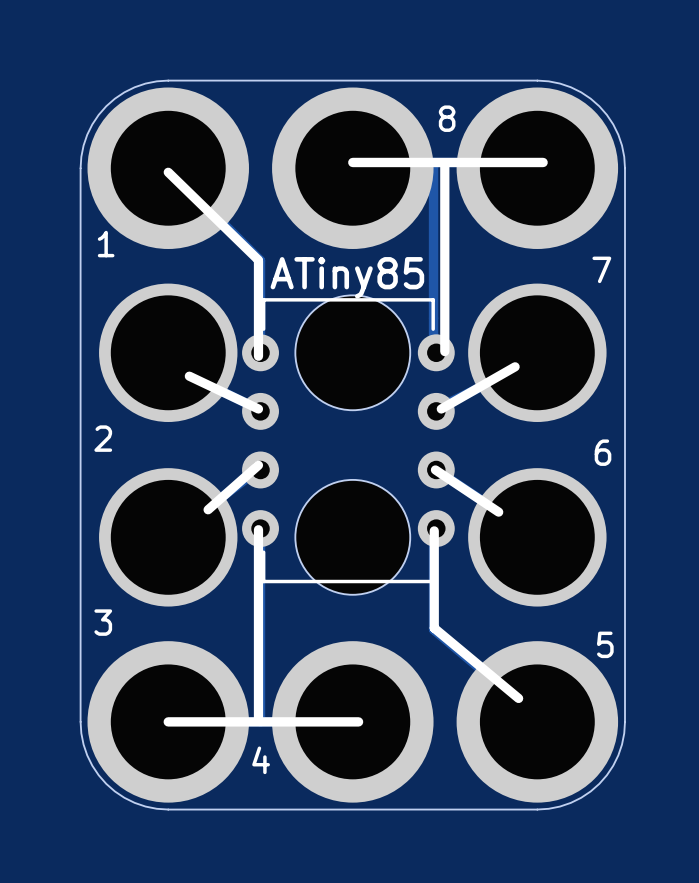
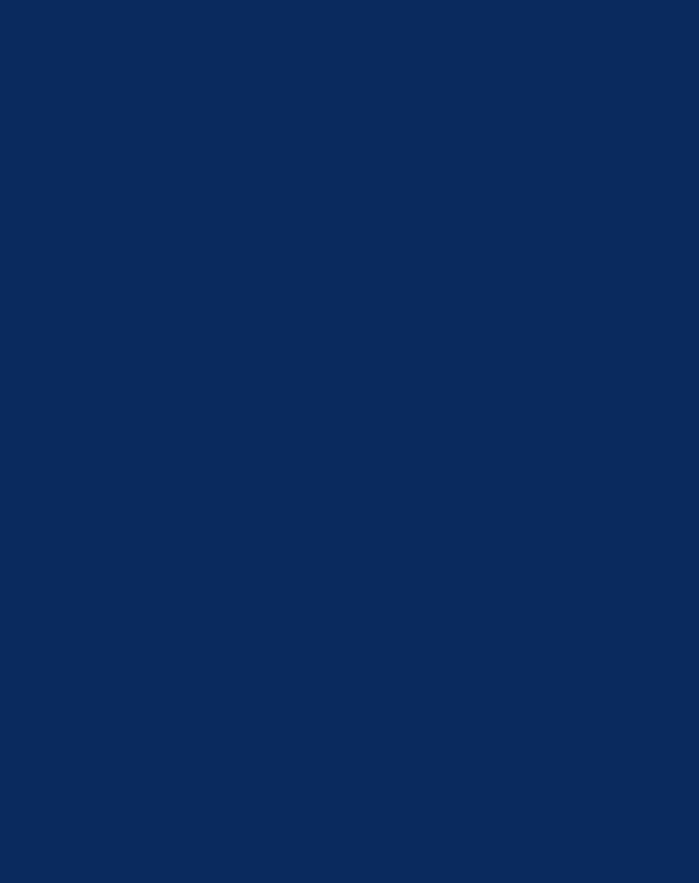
part: (352, 445) -> none

